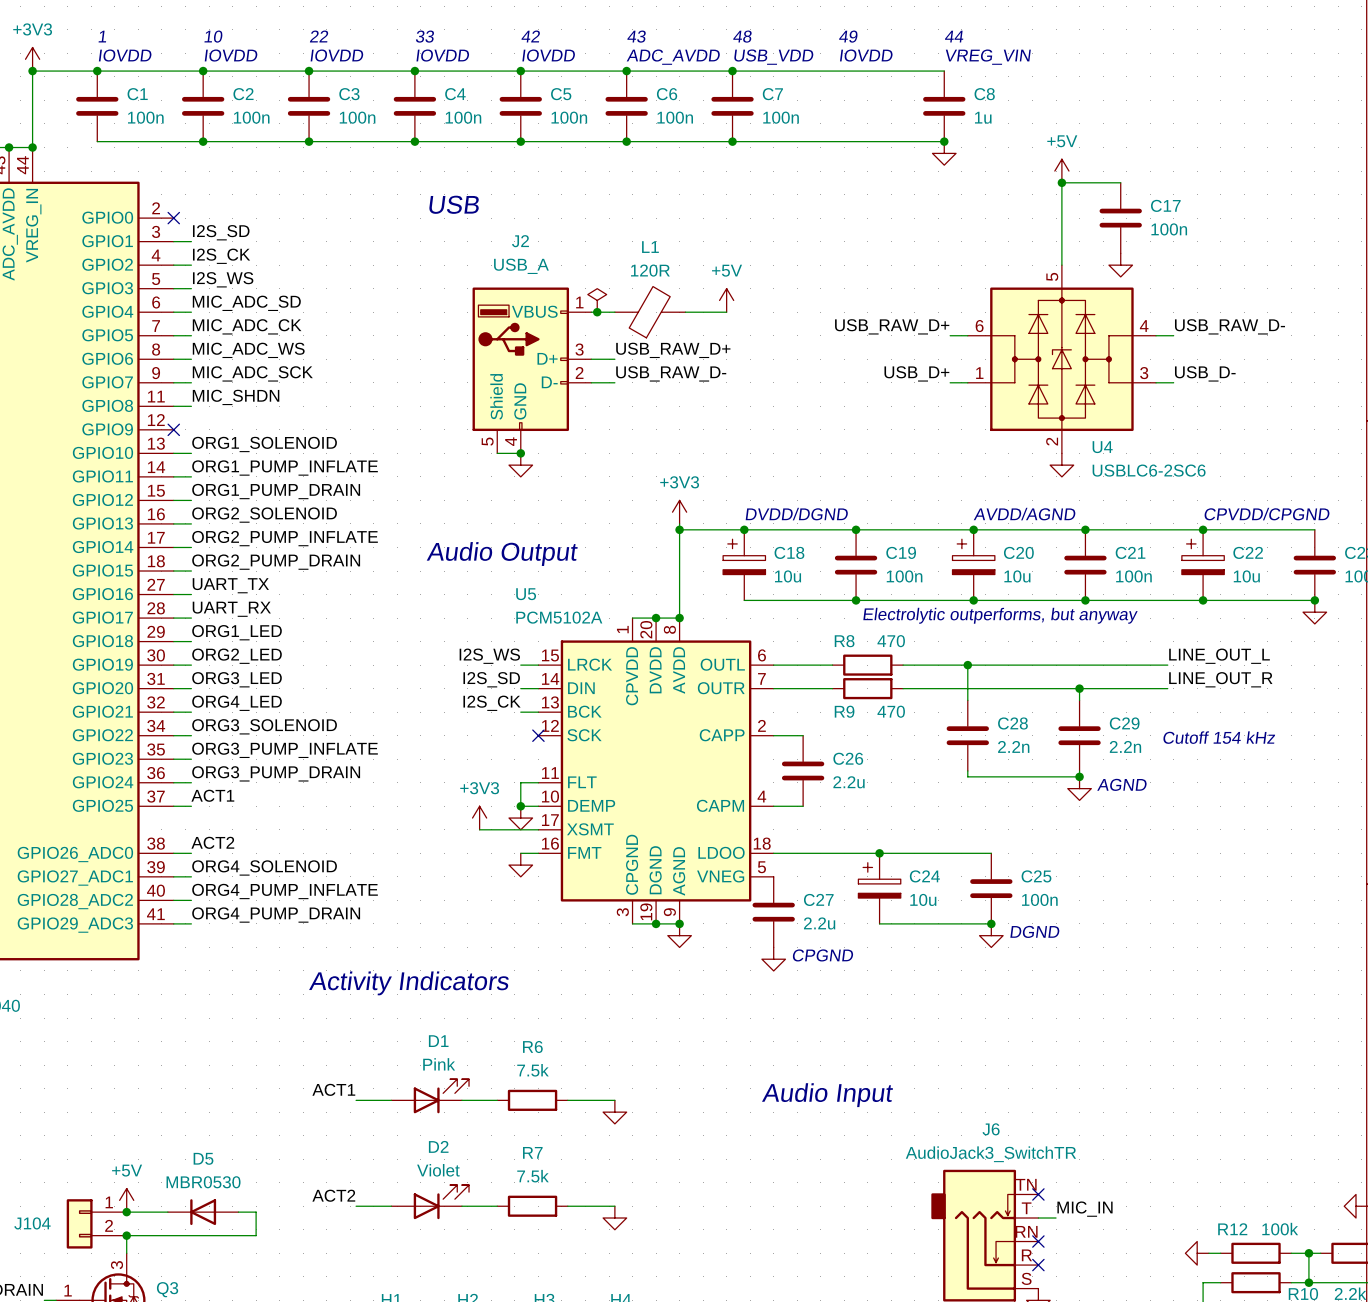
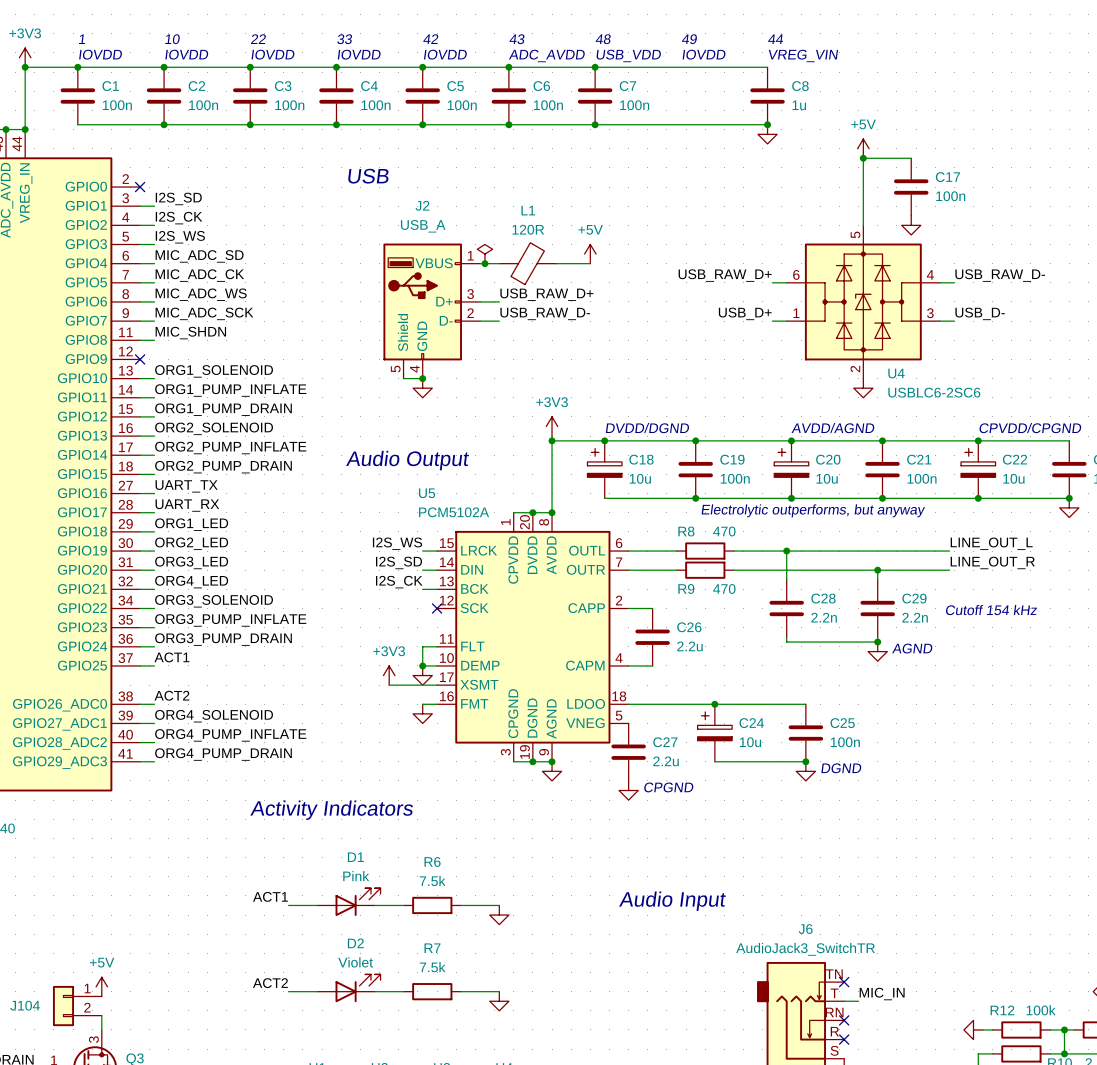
wire: (126, 1212) (167, 1212) -> none
junction: (126, 1212) -> none
D5: MBR0530 (203, 1212) -> none
wire: (238, 1212) (256, 1212) (256, 1235) (126, 1235) -> none
junction: (126, 1235) -> none

